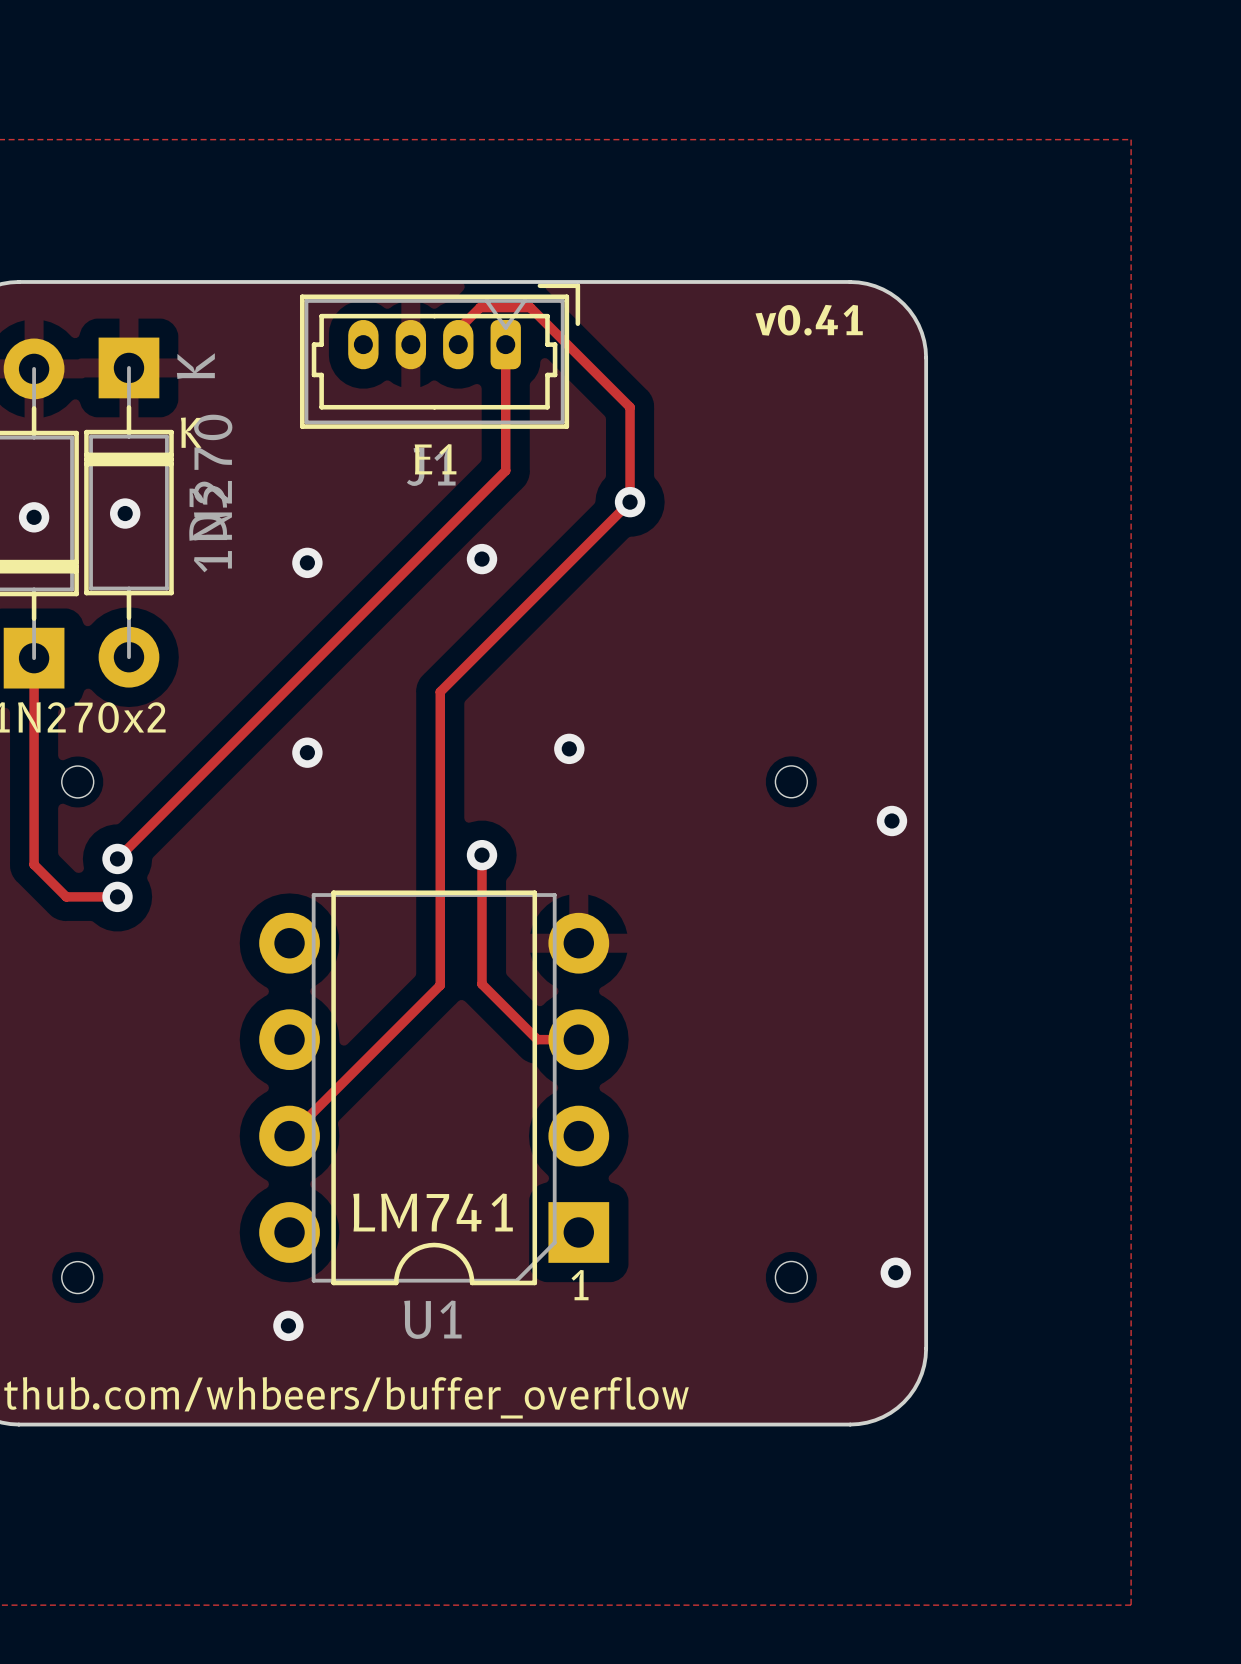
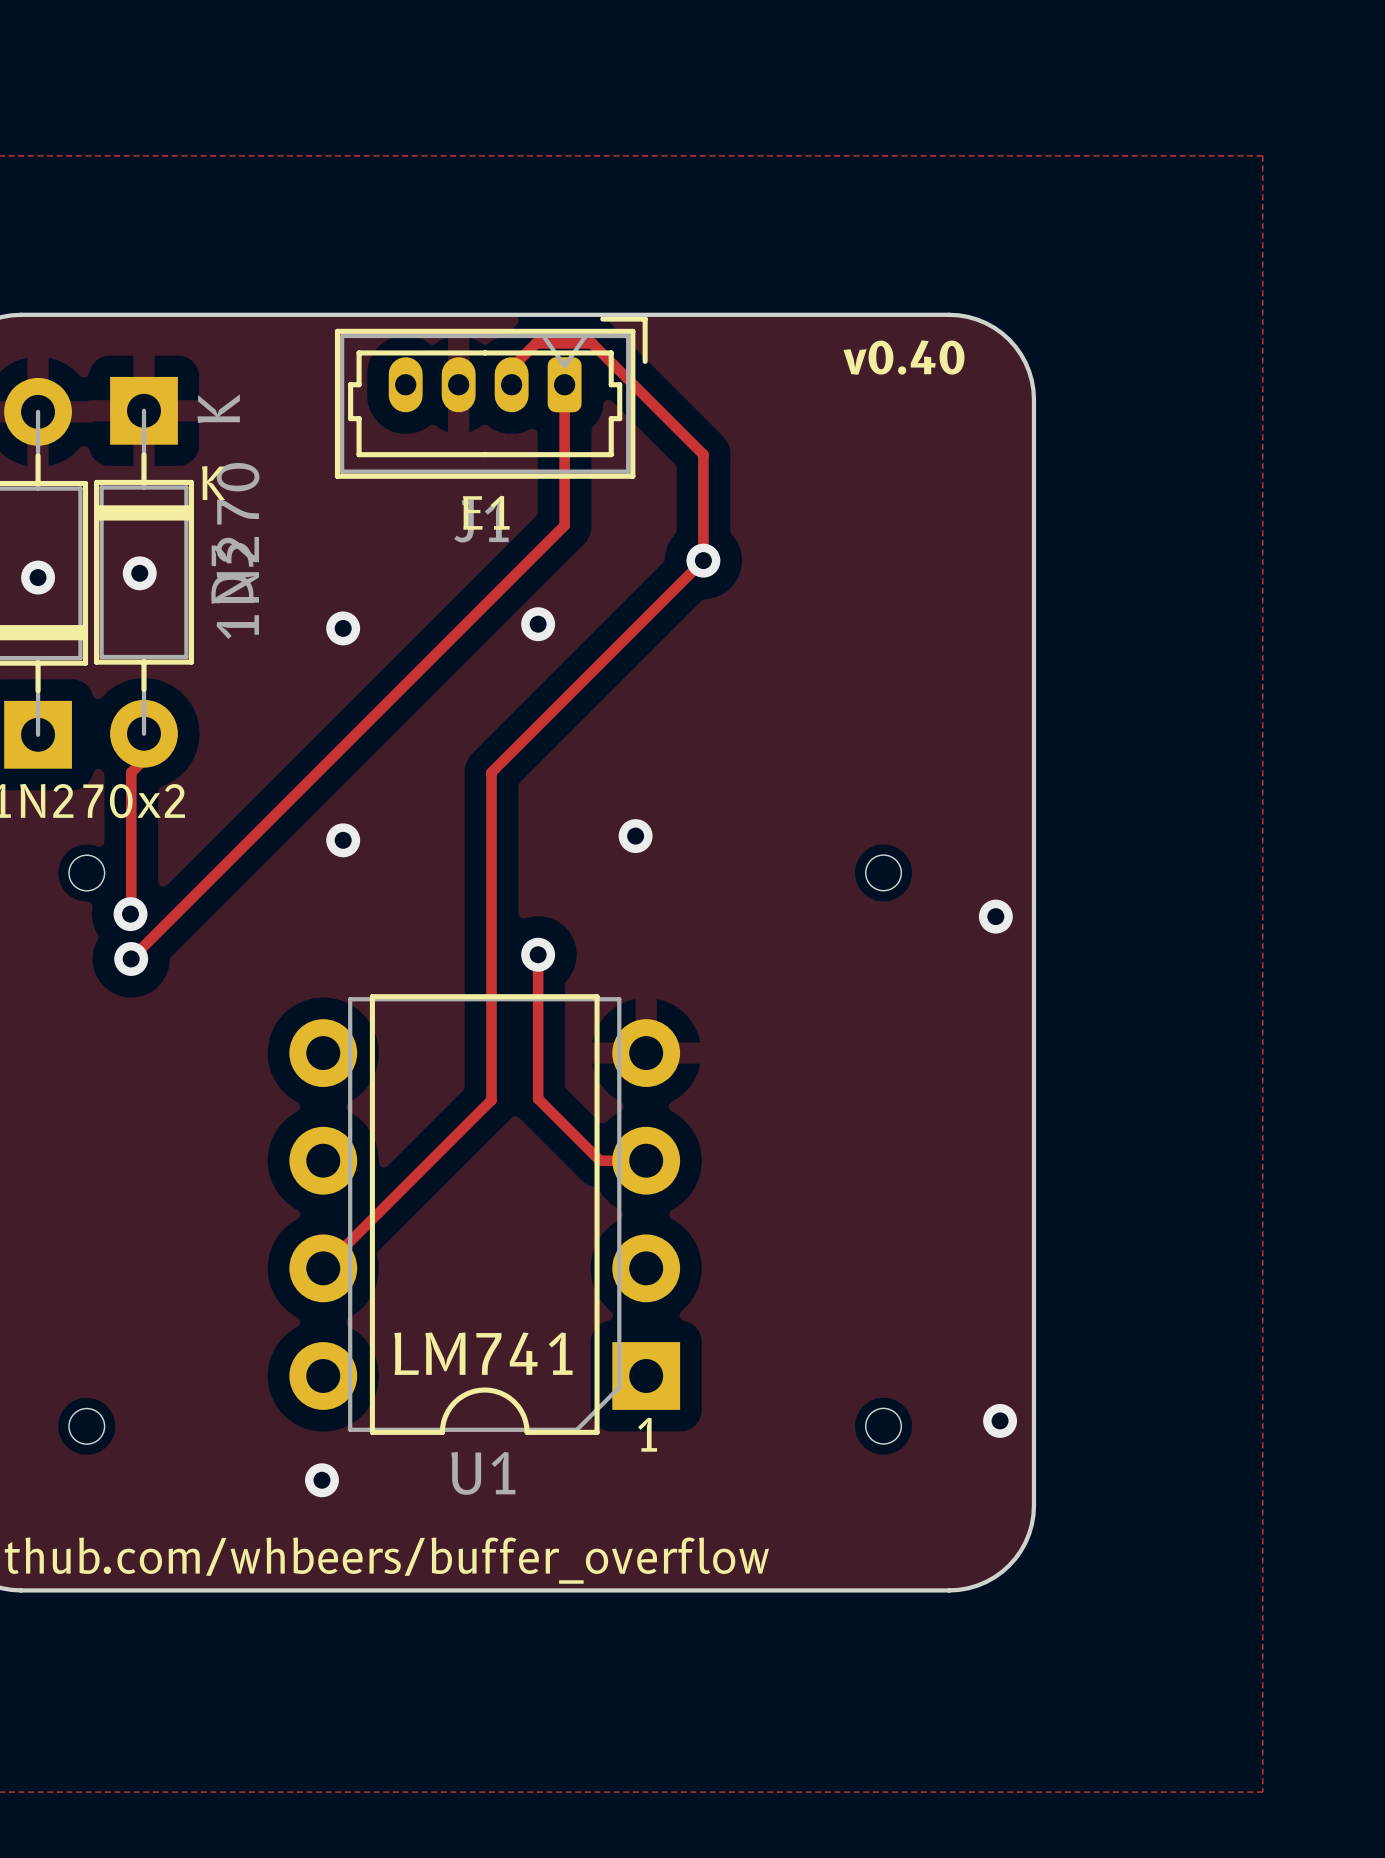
text: v0.41 (809, 320) -> v0.40 (903, 357)
track: none -> (144, 733) (144, 759) (131, 772) (130, 914)
track: (34, 658) (34, 864) (66, 896) (117, 896) -> none
via: none -> (130, 914)
via: (117, 896) -> none

